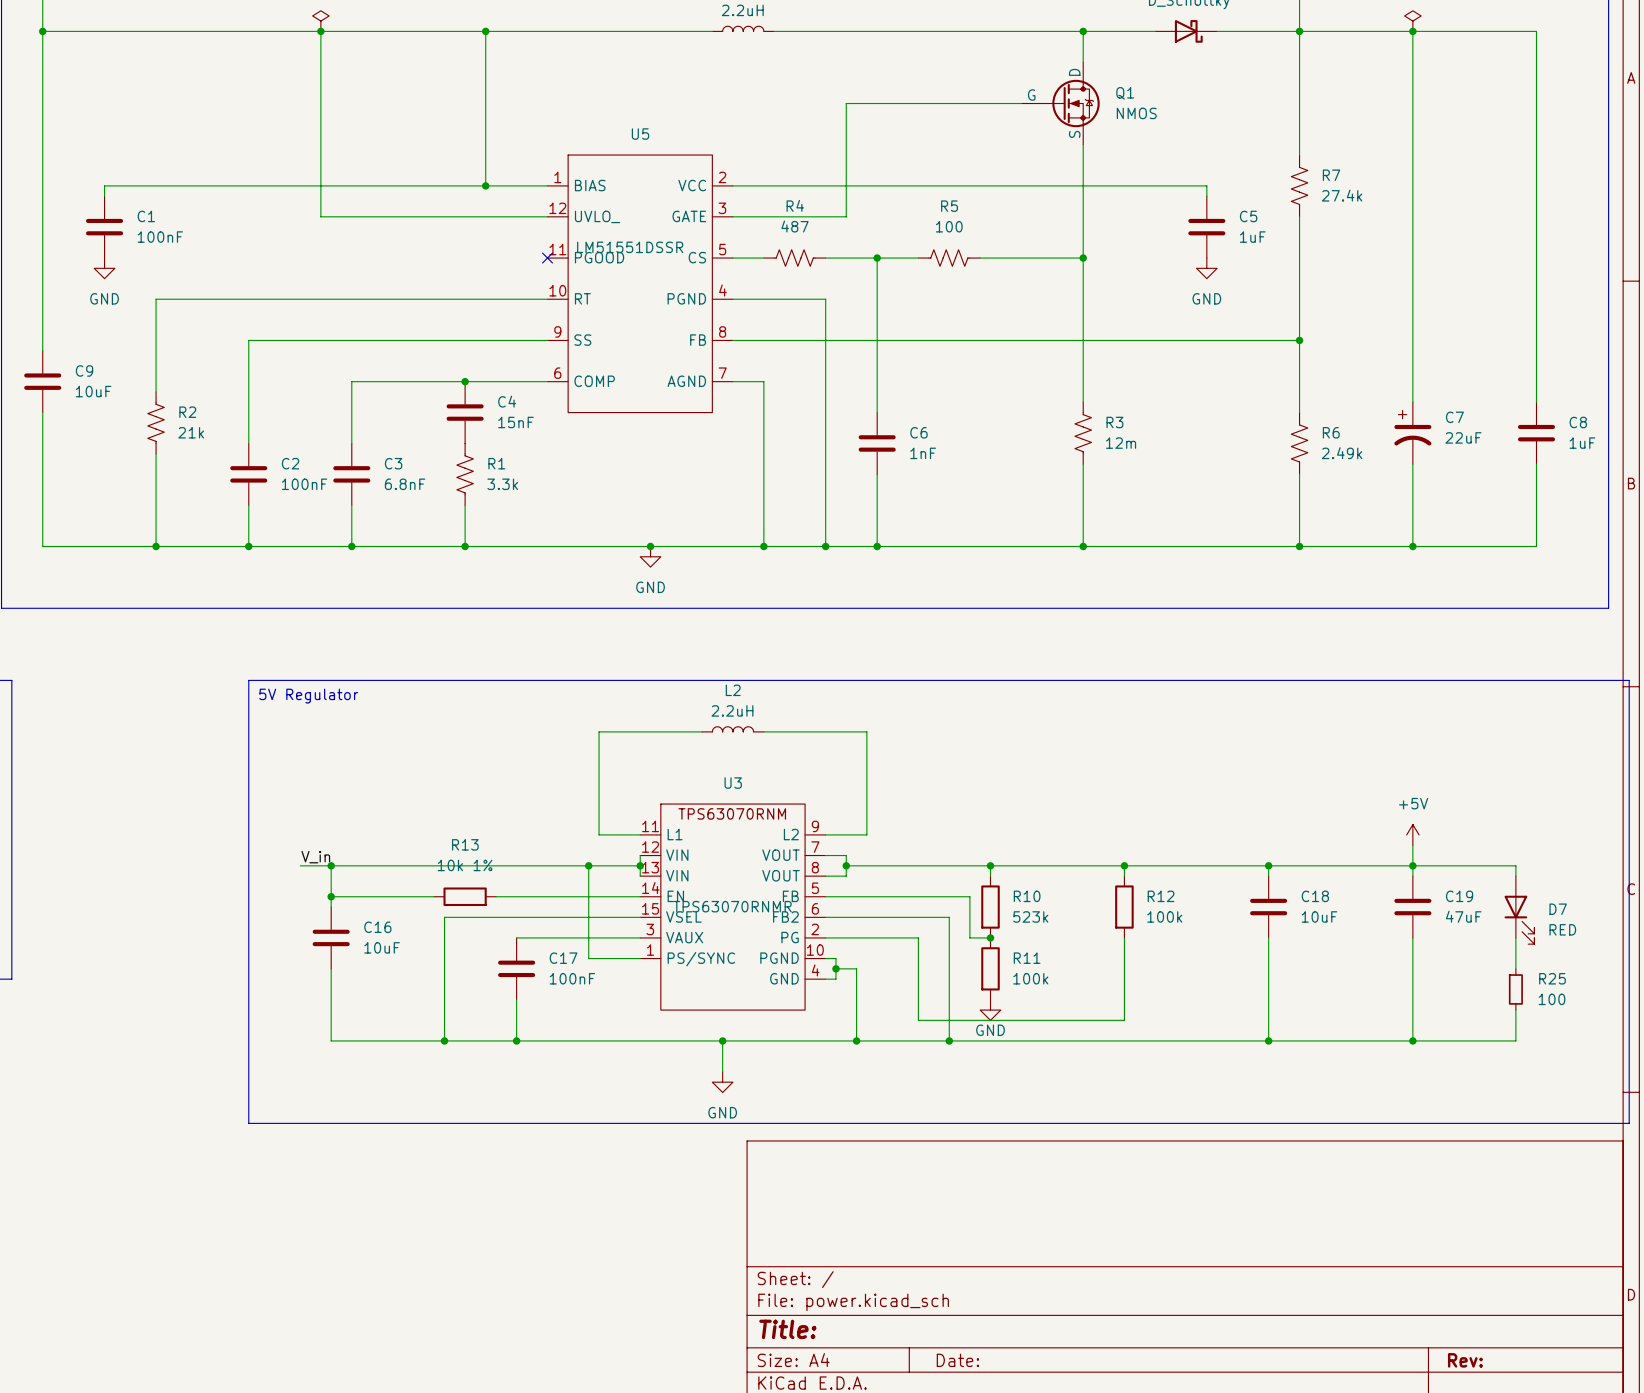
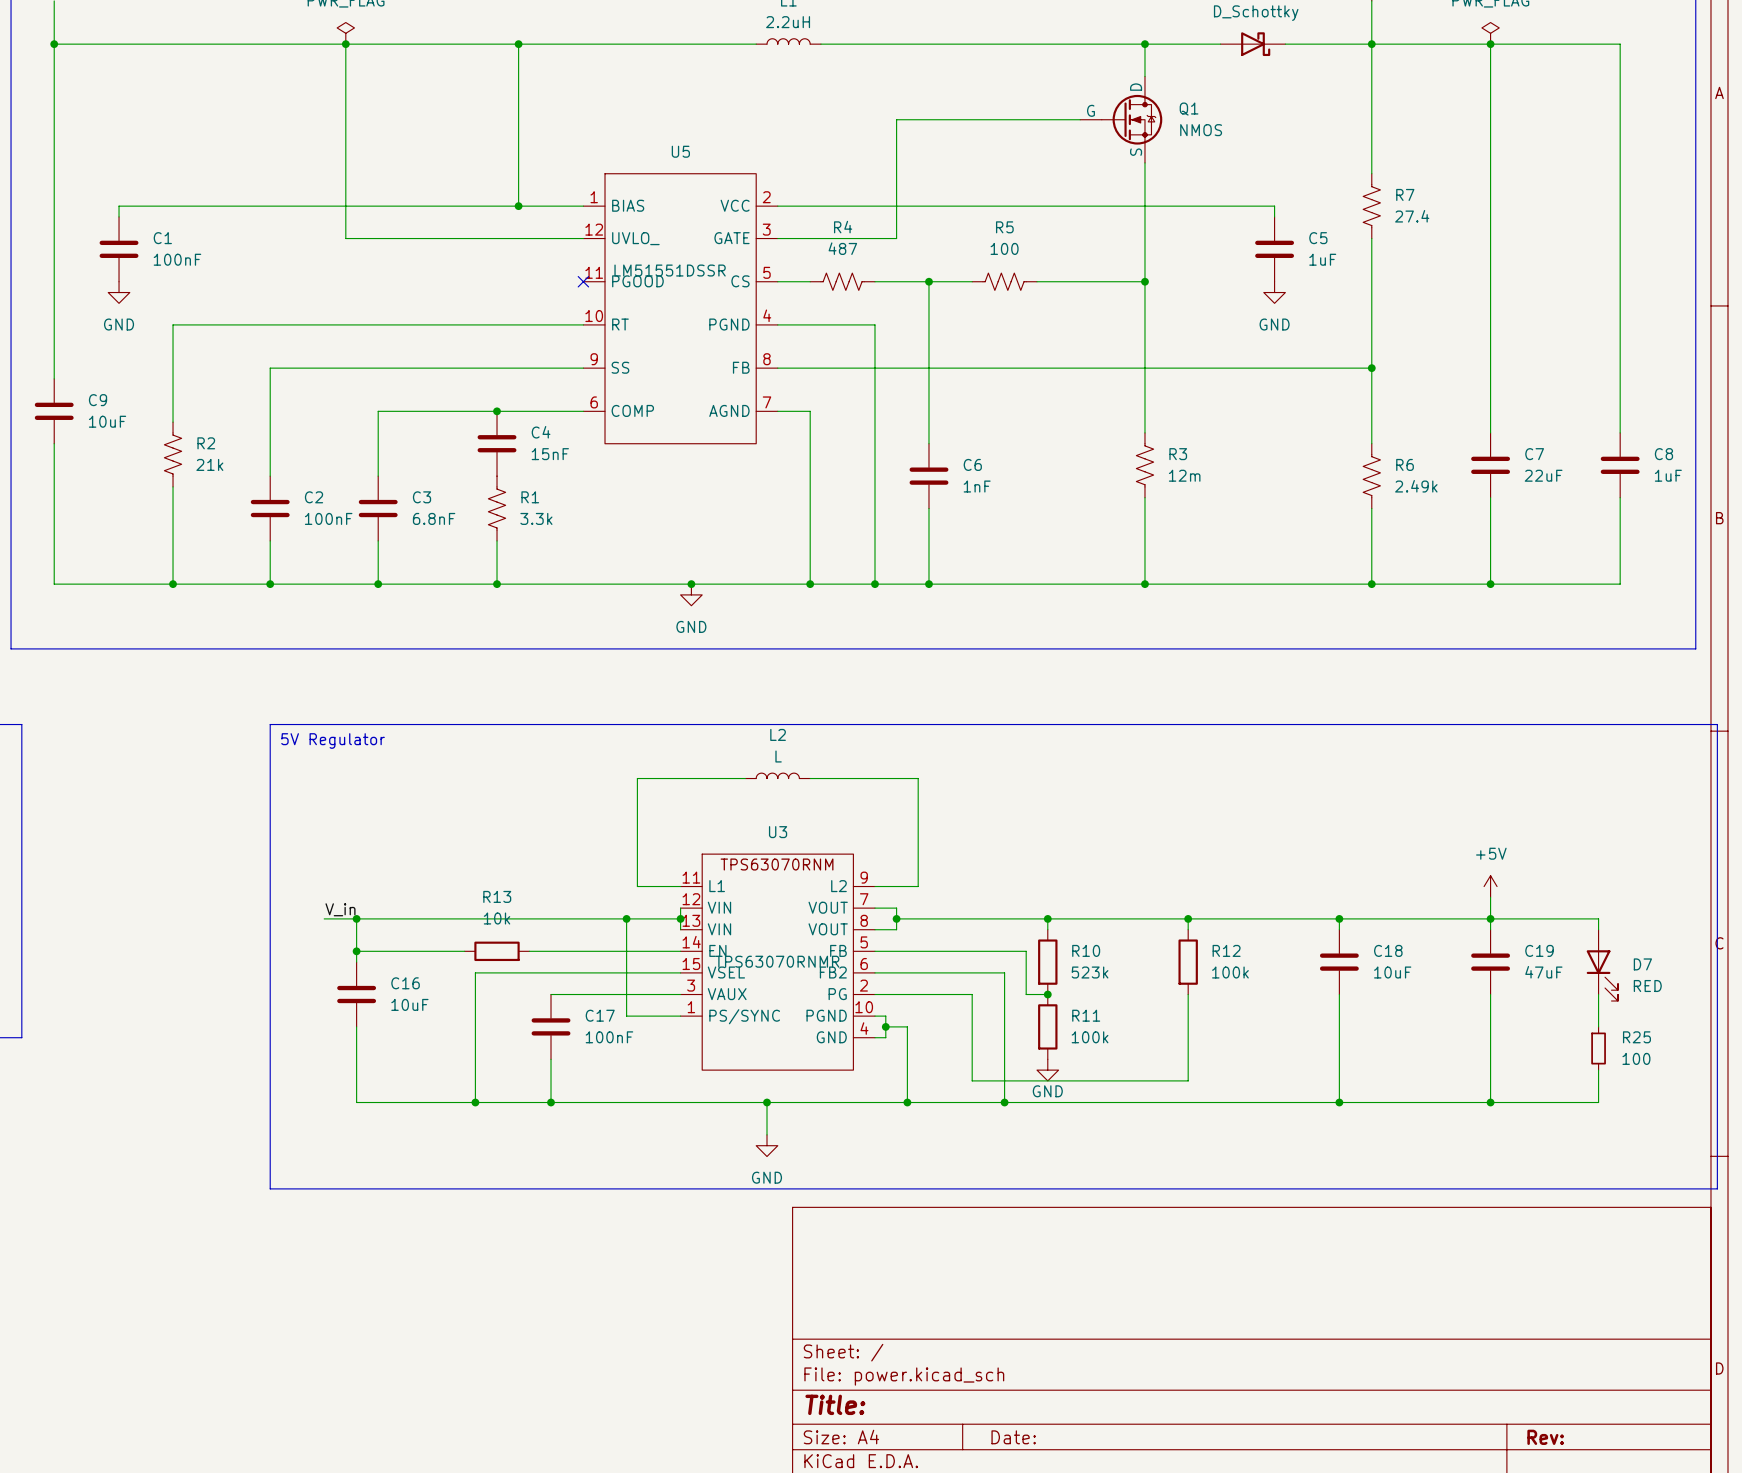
R7 value: 27.4k (1342, 195) -> 27.4 (1412, 216)
C7 symbol: [1394, 402, 1432, 465] -> [1471, 432, 1511, 498]
L2 value: 2.2uH (732, 710) -> L (778, 756)
R13 value: 10k 1% (465, 865) -> 10k (497, 918)

